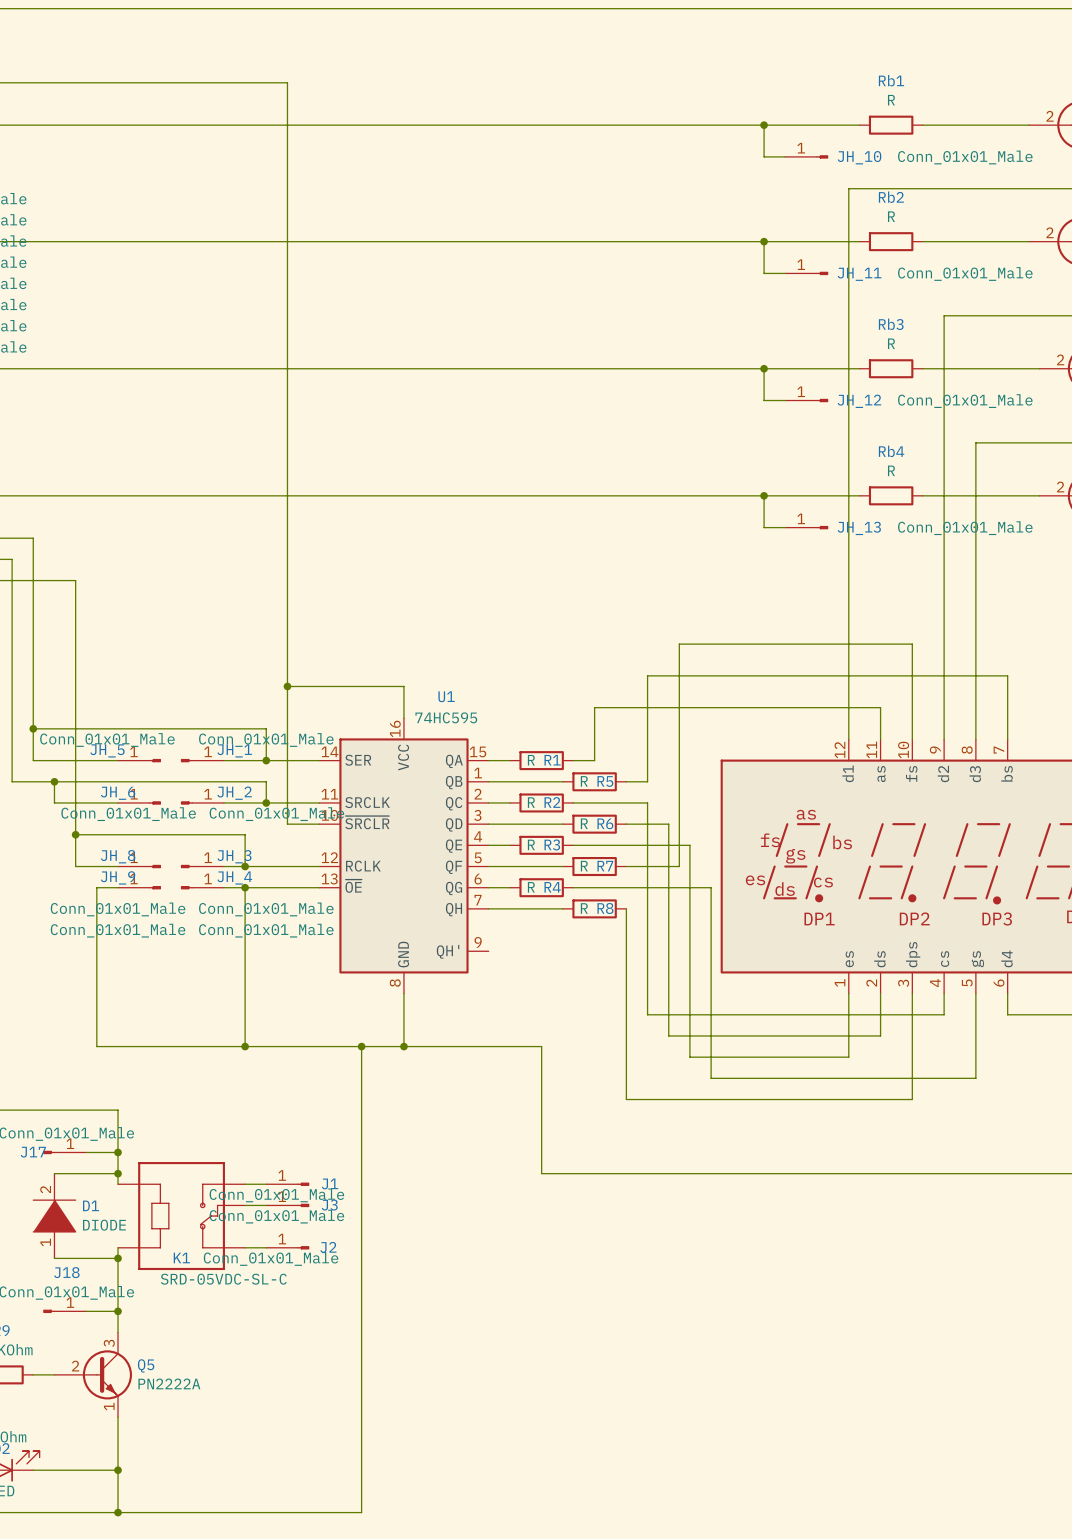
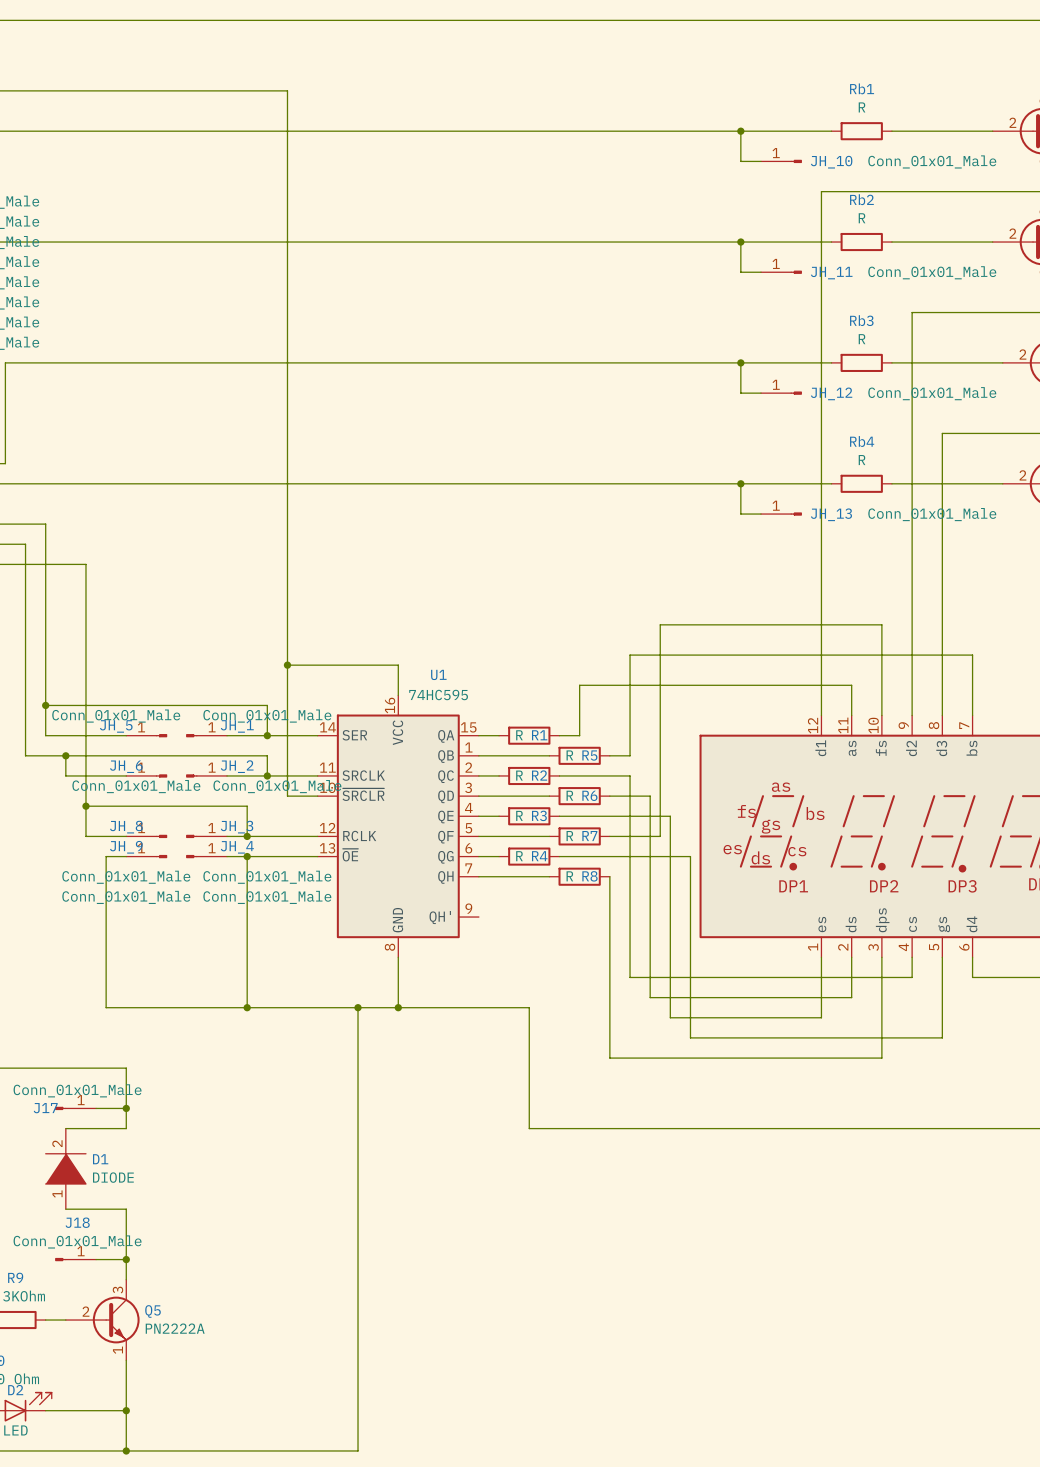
wire: (118, 1173) (118, 1184) -> none
junction: (118, 1173) -> none
wire: (245, 1184) (266, 1184) -> none
J1: Conn_01x01_Male (287, 1184) -> none
wire: (245, 1205) (266, 1205) -> none
J3: Conn_01x01_Male (287, 1205) -> none
K1: SRD-05VDC-SL-C (181, 1216) -> none
wire: (118, 1247) (118, 1258) -> none
wire: (245, 1247) (266, 1247) -> none
J2: Conn_01x01_Male (287, 1247) -> none
junction: (118, 1258) -> none

